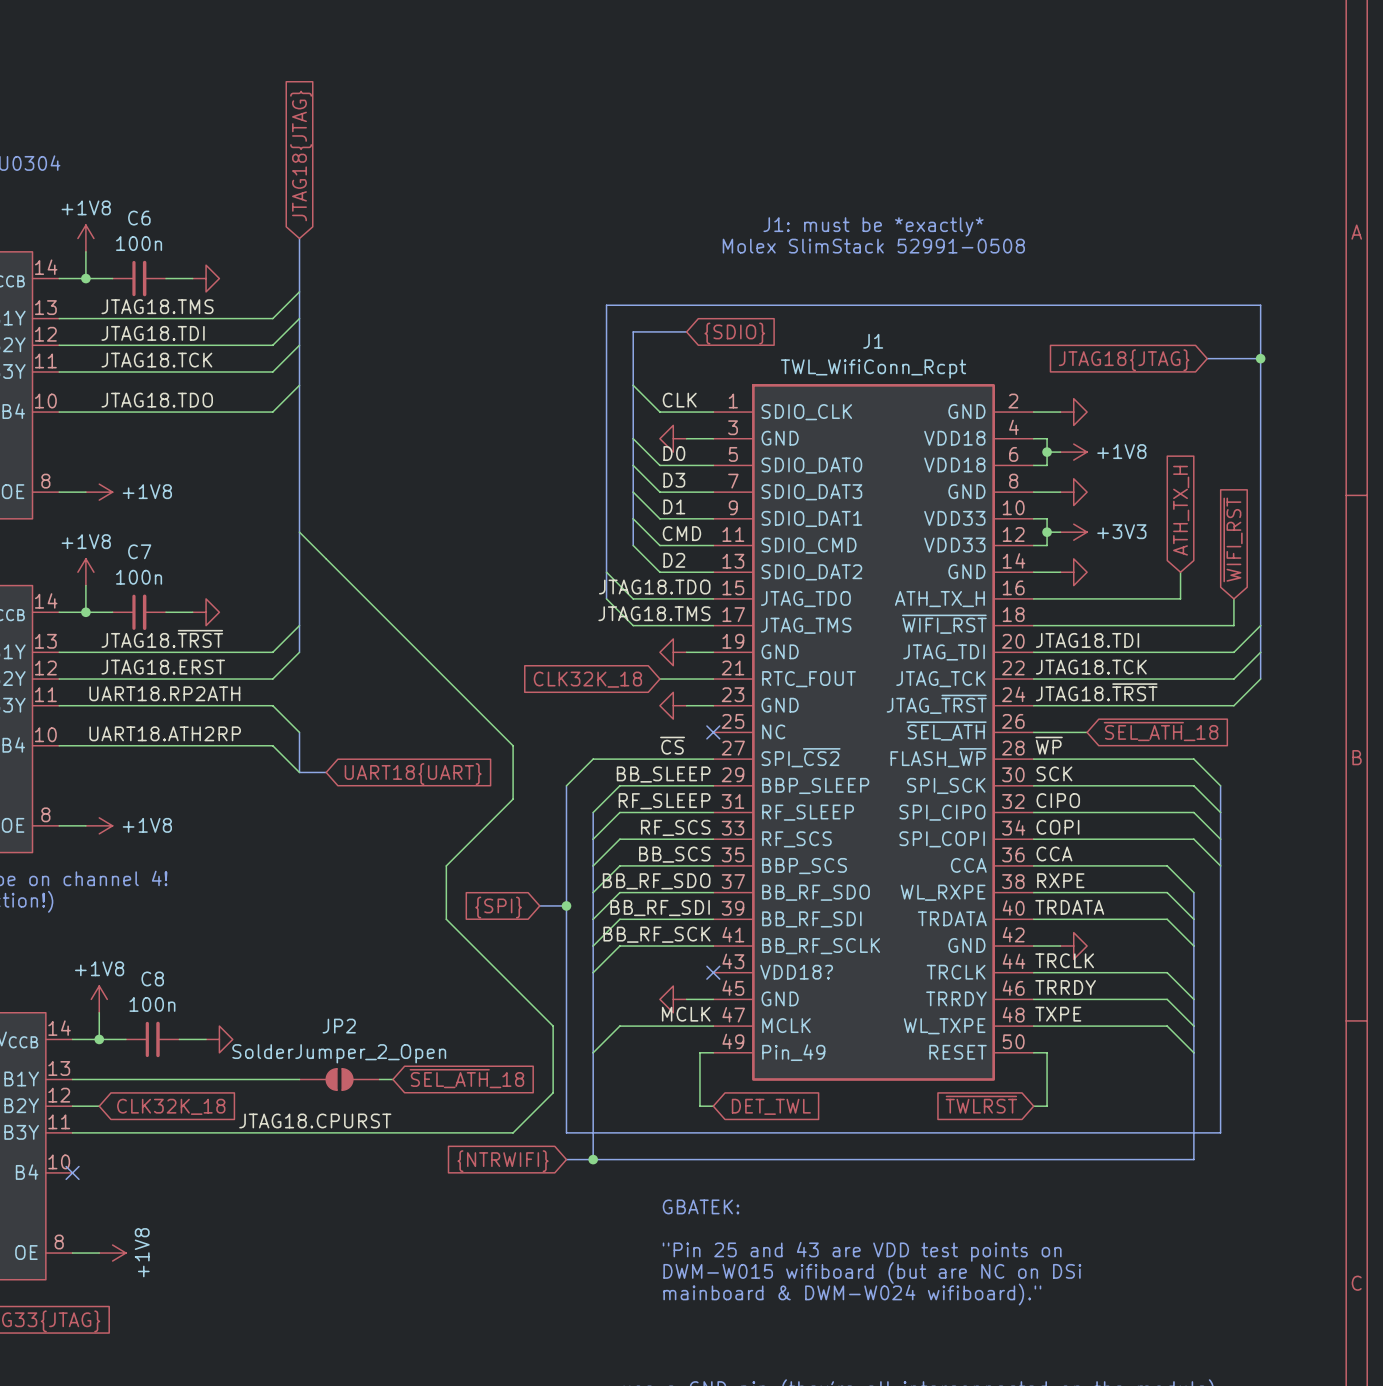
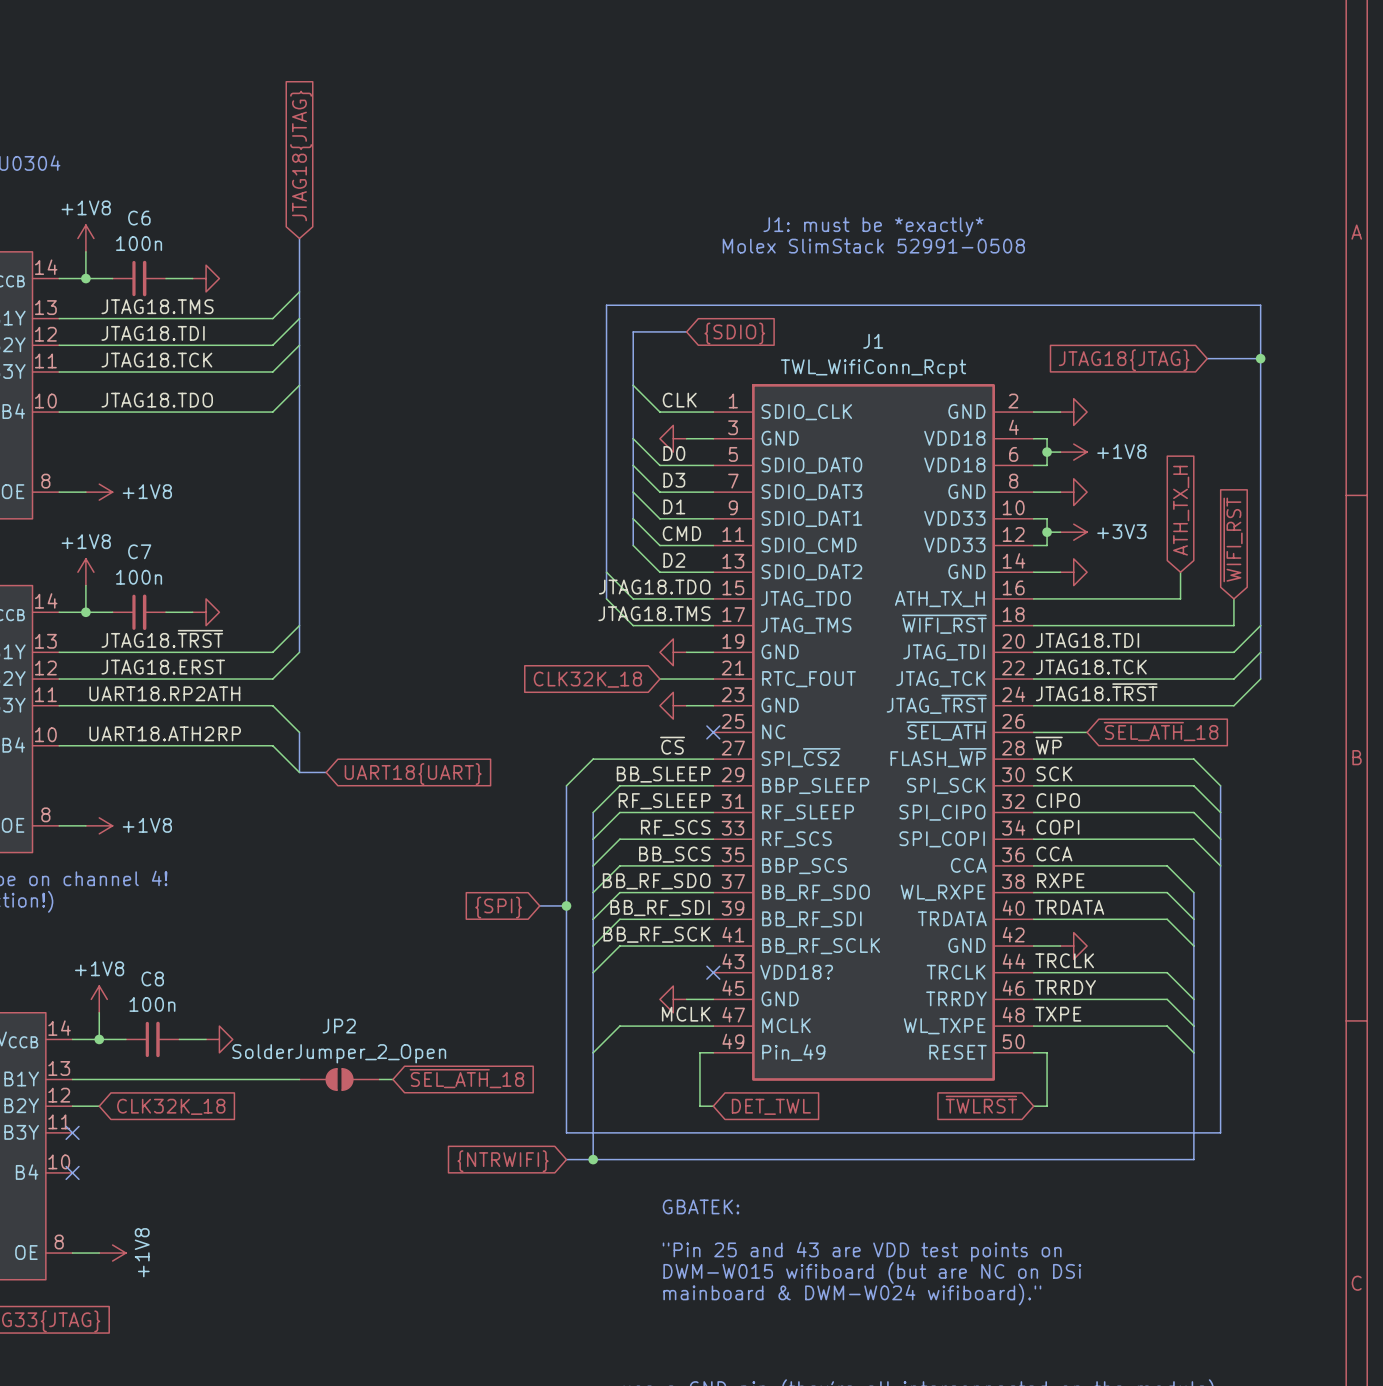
wire: (299, 532) (513, 745) (513, 799) (446, 865) (446, 919) (553, 1026) (553, 1092) (513, 1132) (72, 1132) -> none
label: JTAG18.CPURST (315, 1120) -> none
no-connect mark: none -> (72, 1132)

